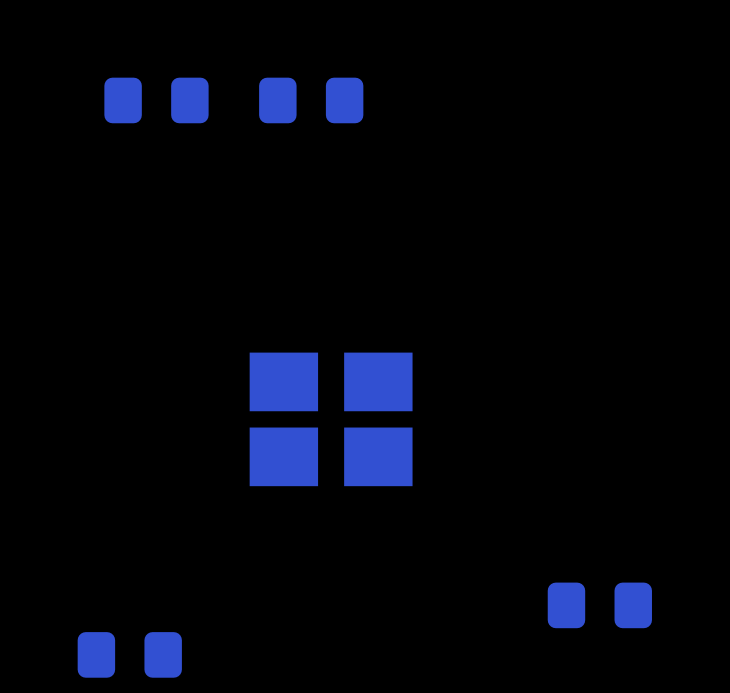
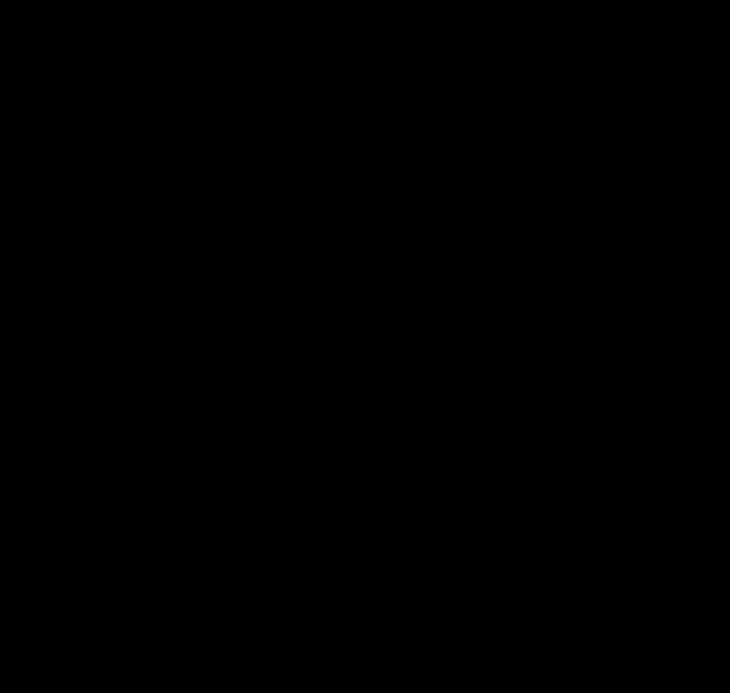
part: (156, 100) -> none
part: (311, 100) -> none
part: (331, 419) -> none
part: (599, 605) -> none
part: (129, 654) -> none

